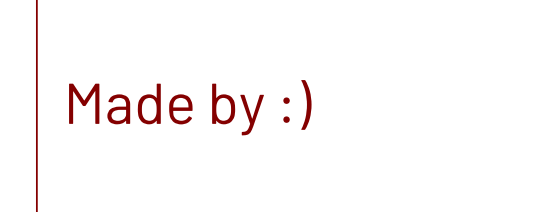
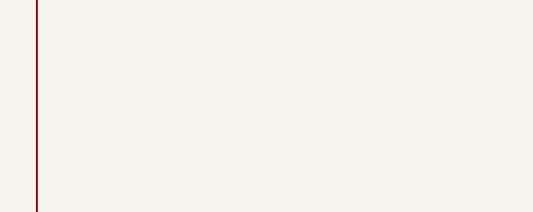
title block: Made by :) (190, 107) -> none

